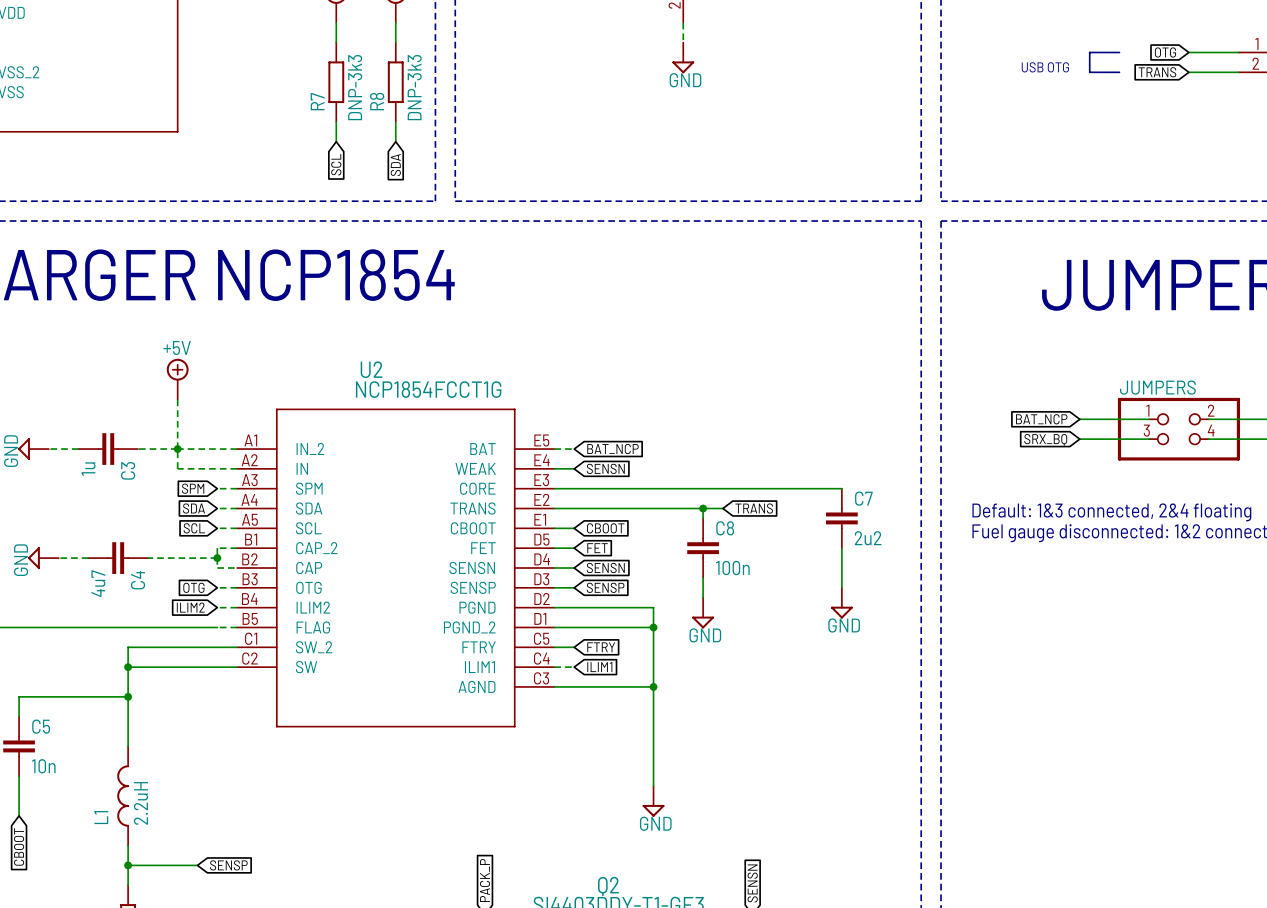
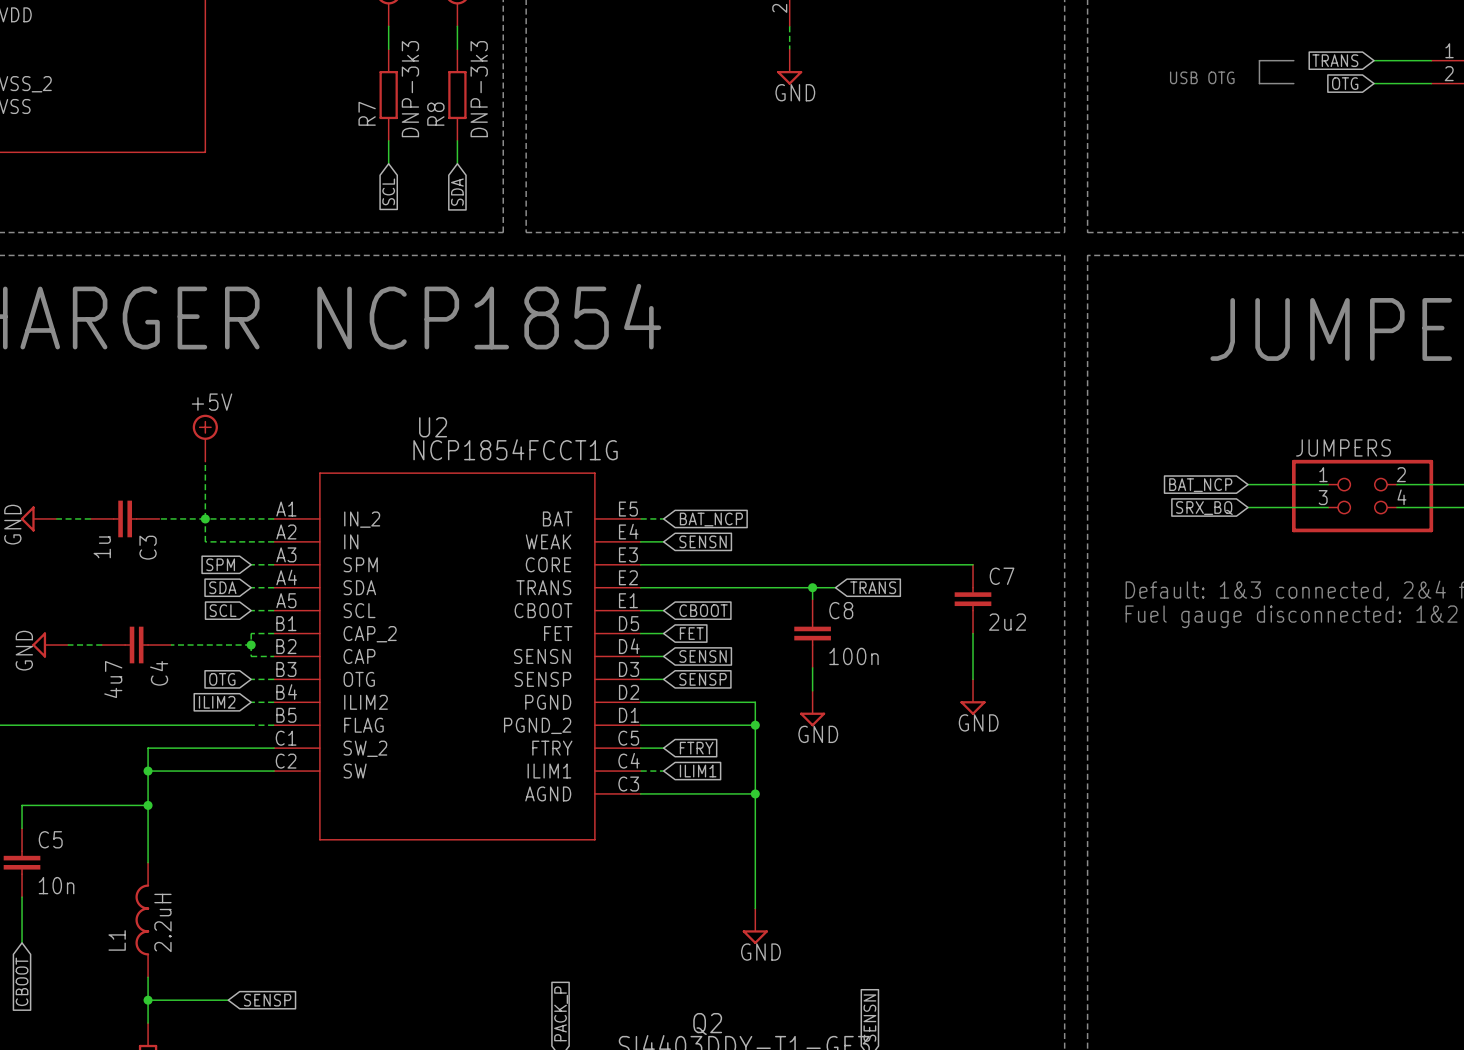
global label: OTG (1165, 52) -> TRANS (1335, 60)
global label: TRANS (1157, 72) -> OTG (1345, 83)

